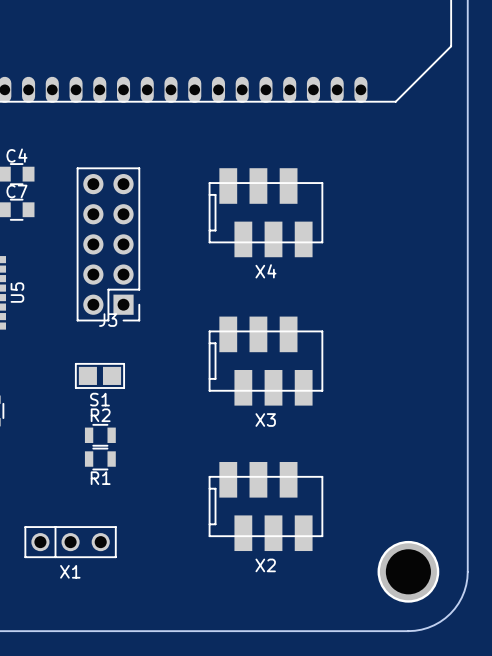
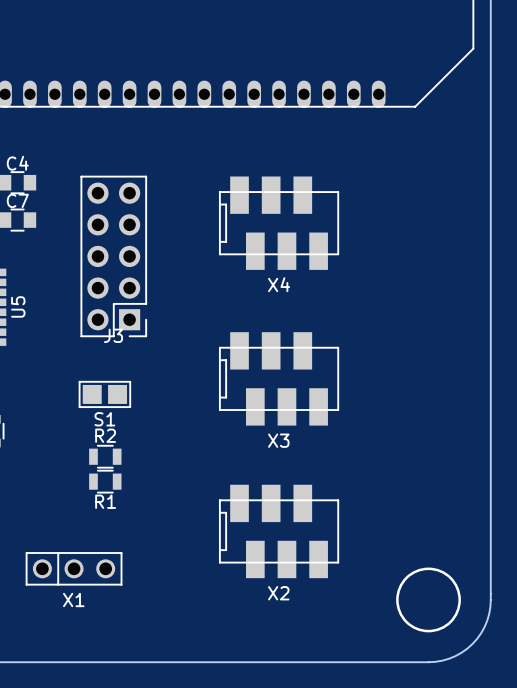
via: (408, 571) -> none

